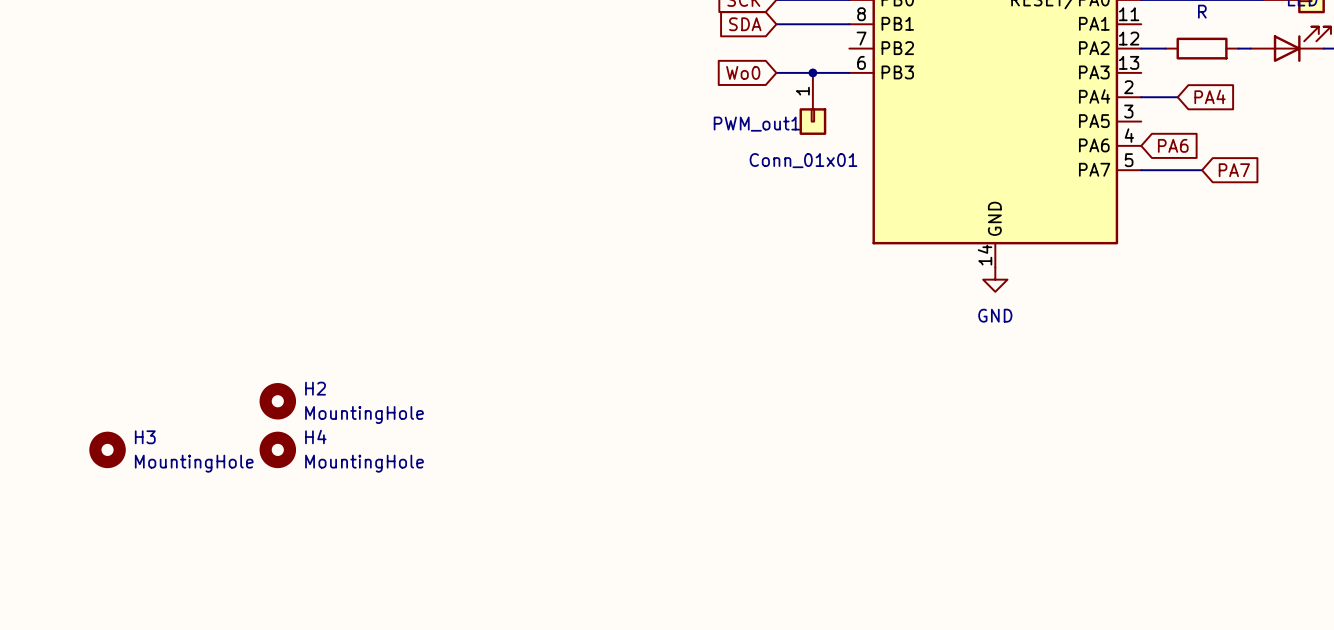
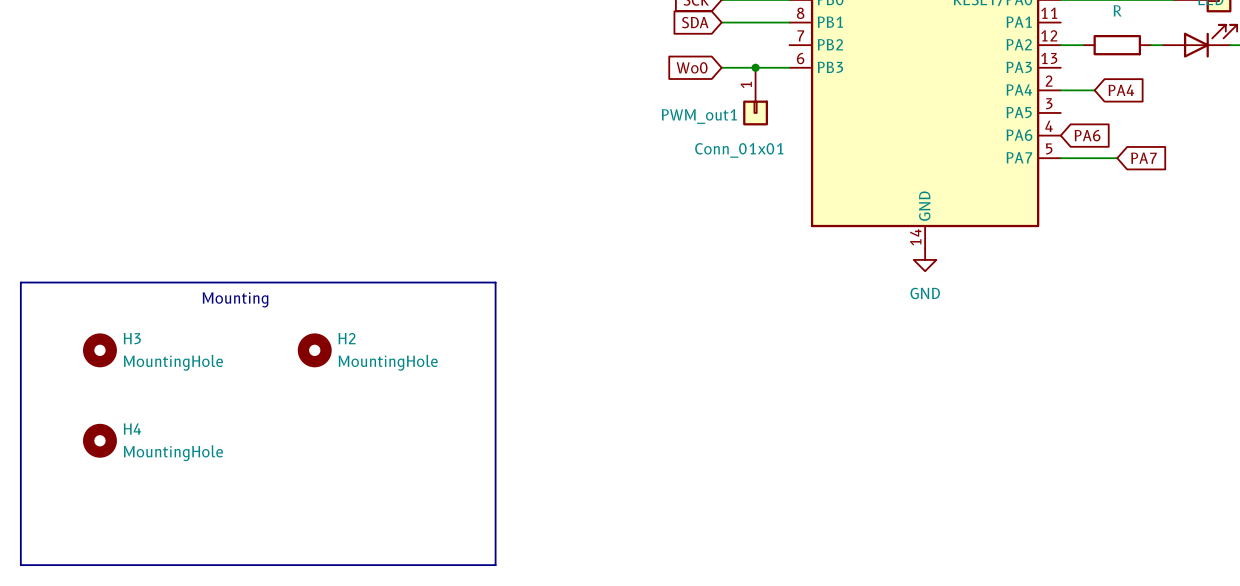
line: none -> (20, 282) (495, 282) (495, 565) (20, 565) (20, 282)
text: none -> Mounting (235, 299)
H2 position: (277, 401) -> (314, 350)
H3 position: (107, 449) -> (99, 350)
H4 position: (277, 449) -> (99, 440)

